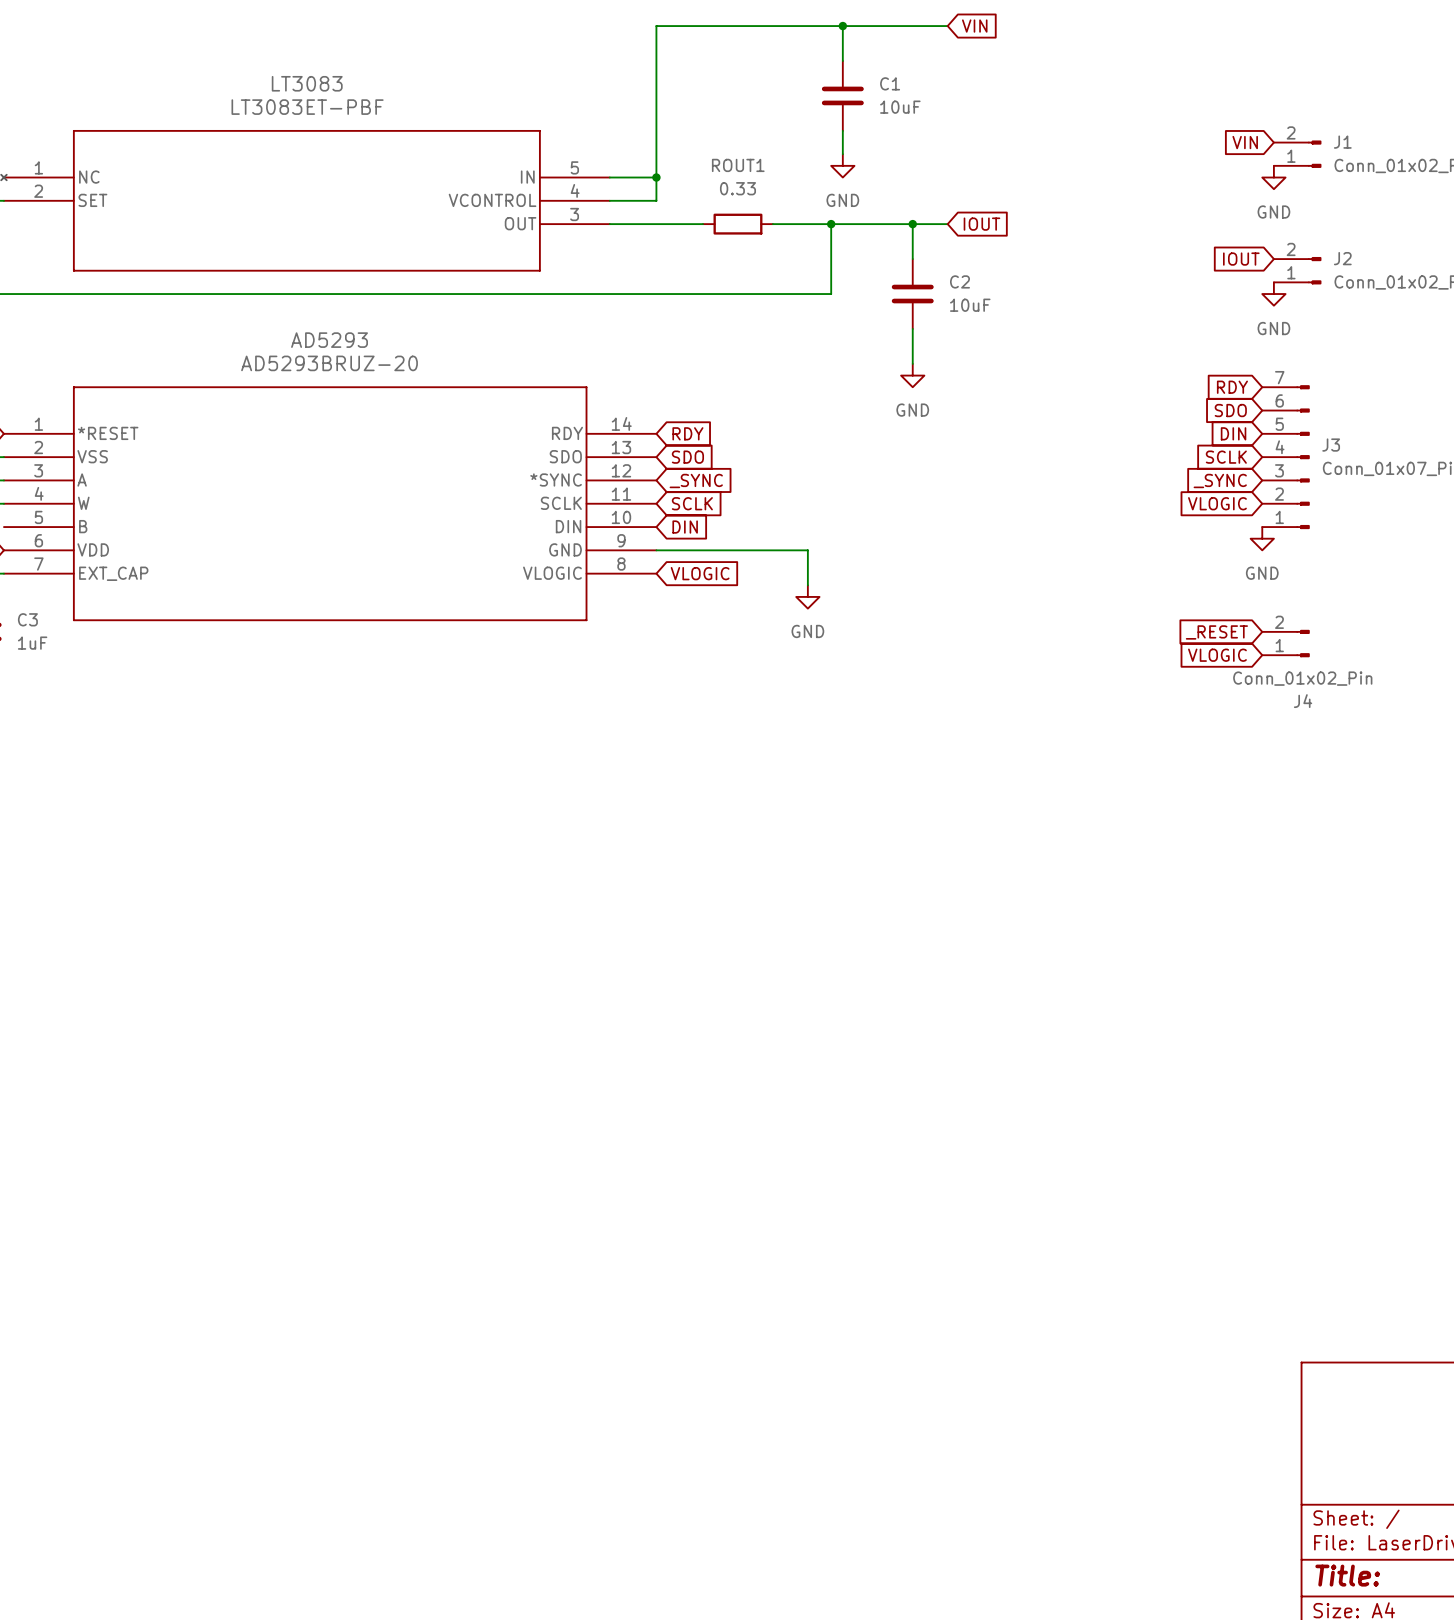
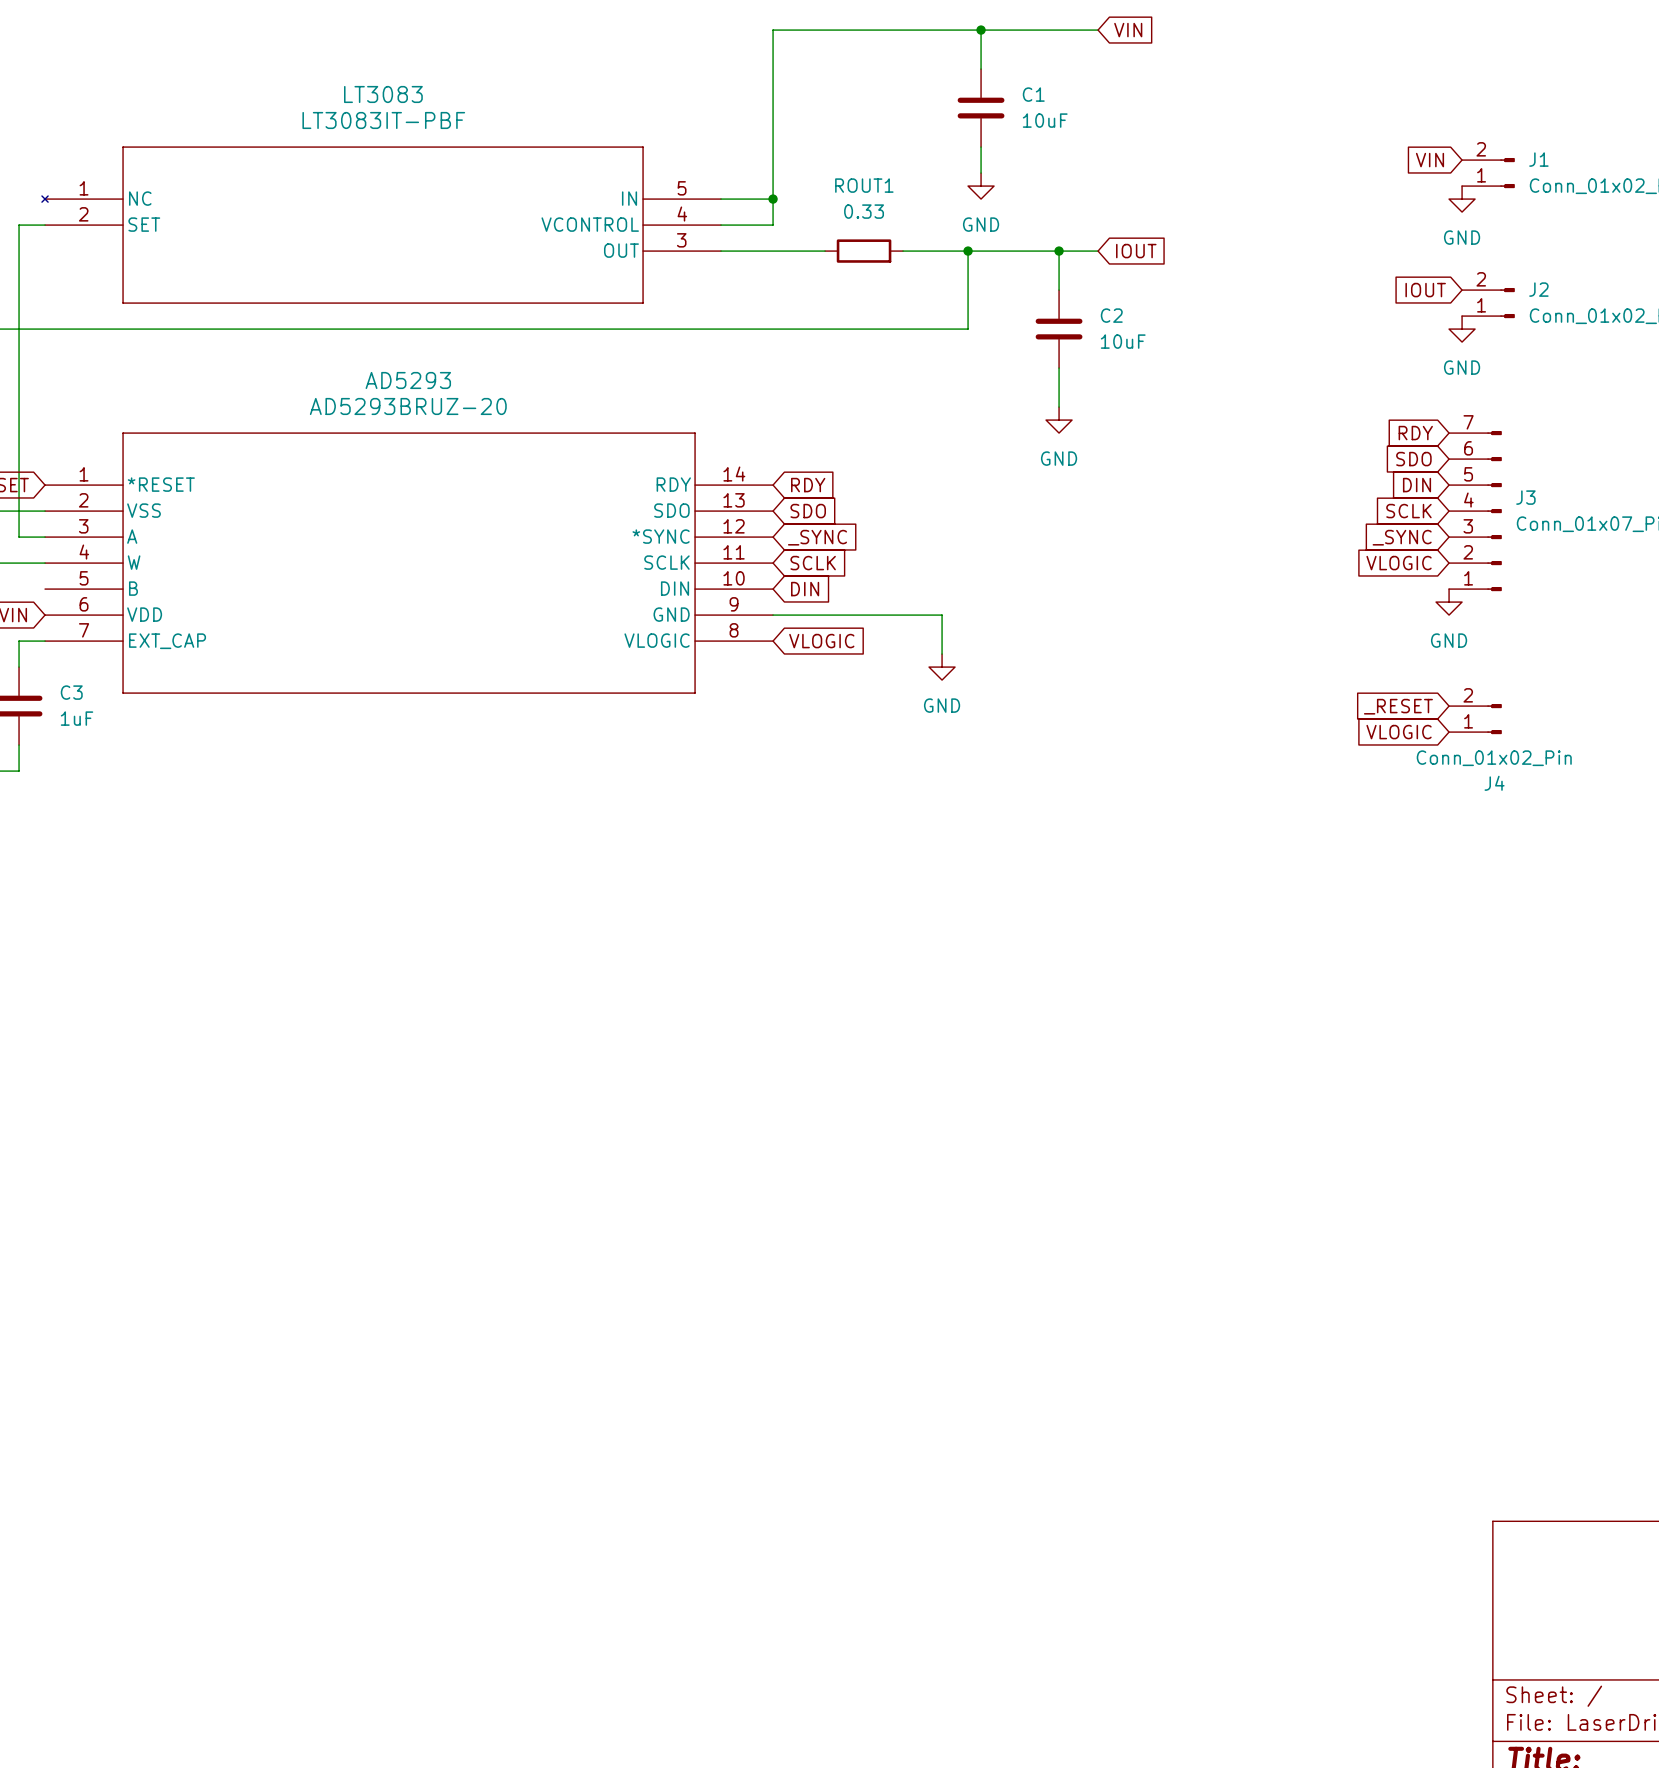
LT3083 value: LT3083ET-PBF (307, 107) -> LT3083IT-PBF (383, 120)

